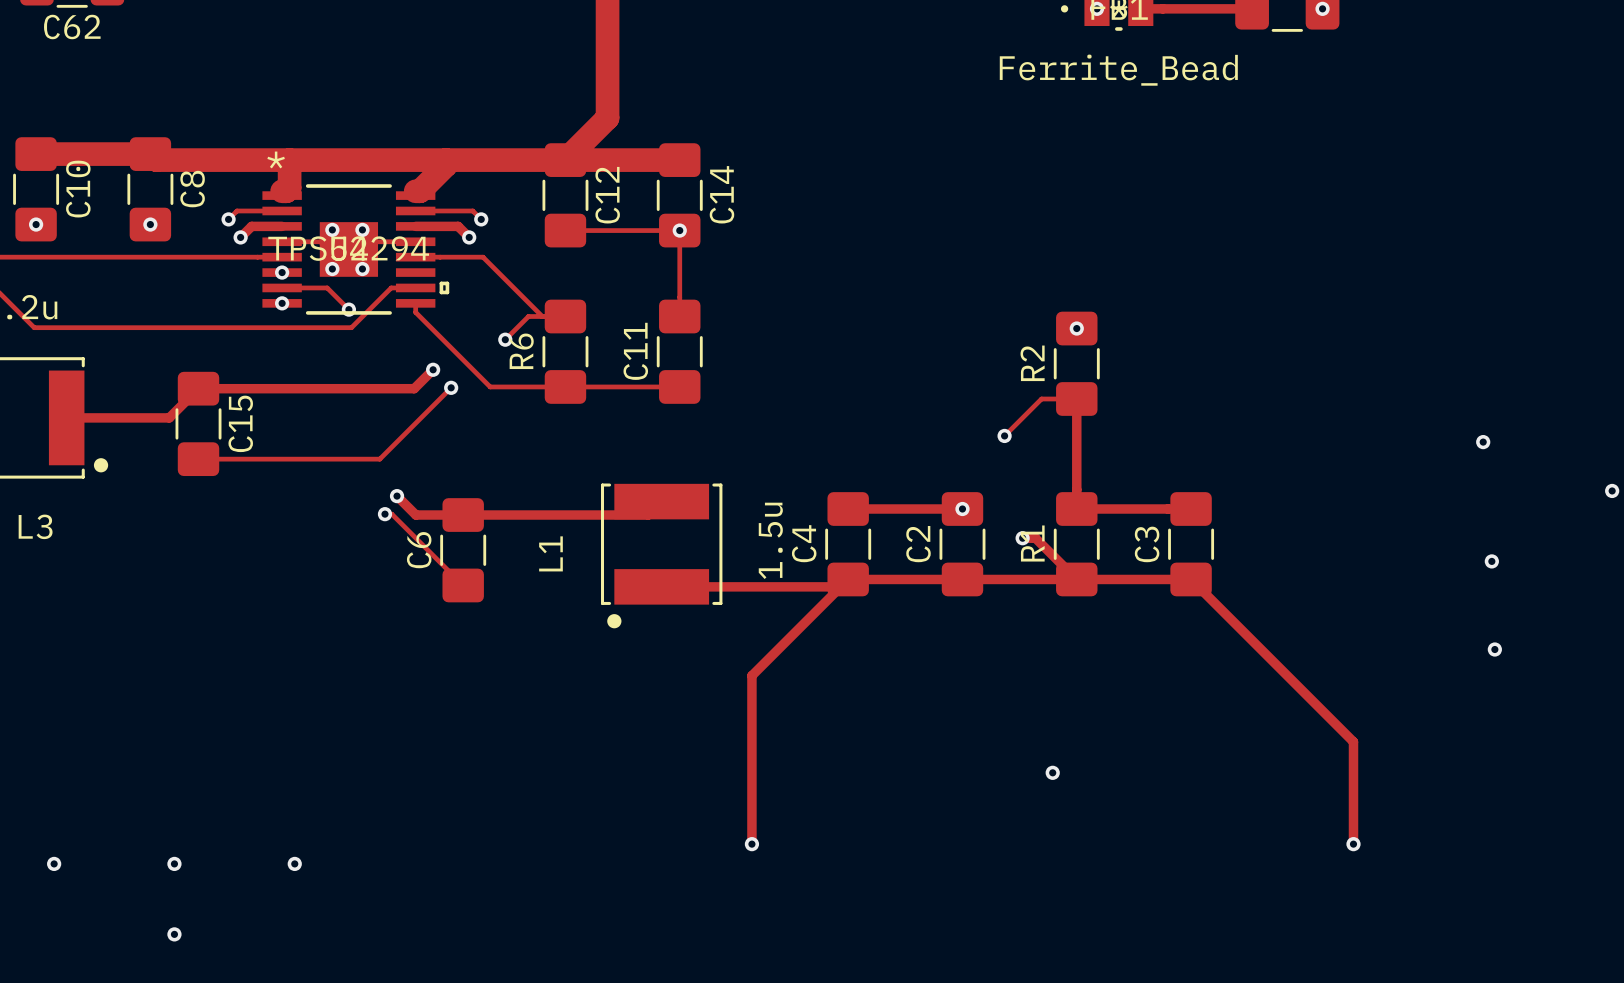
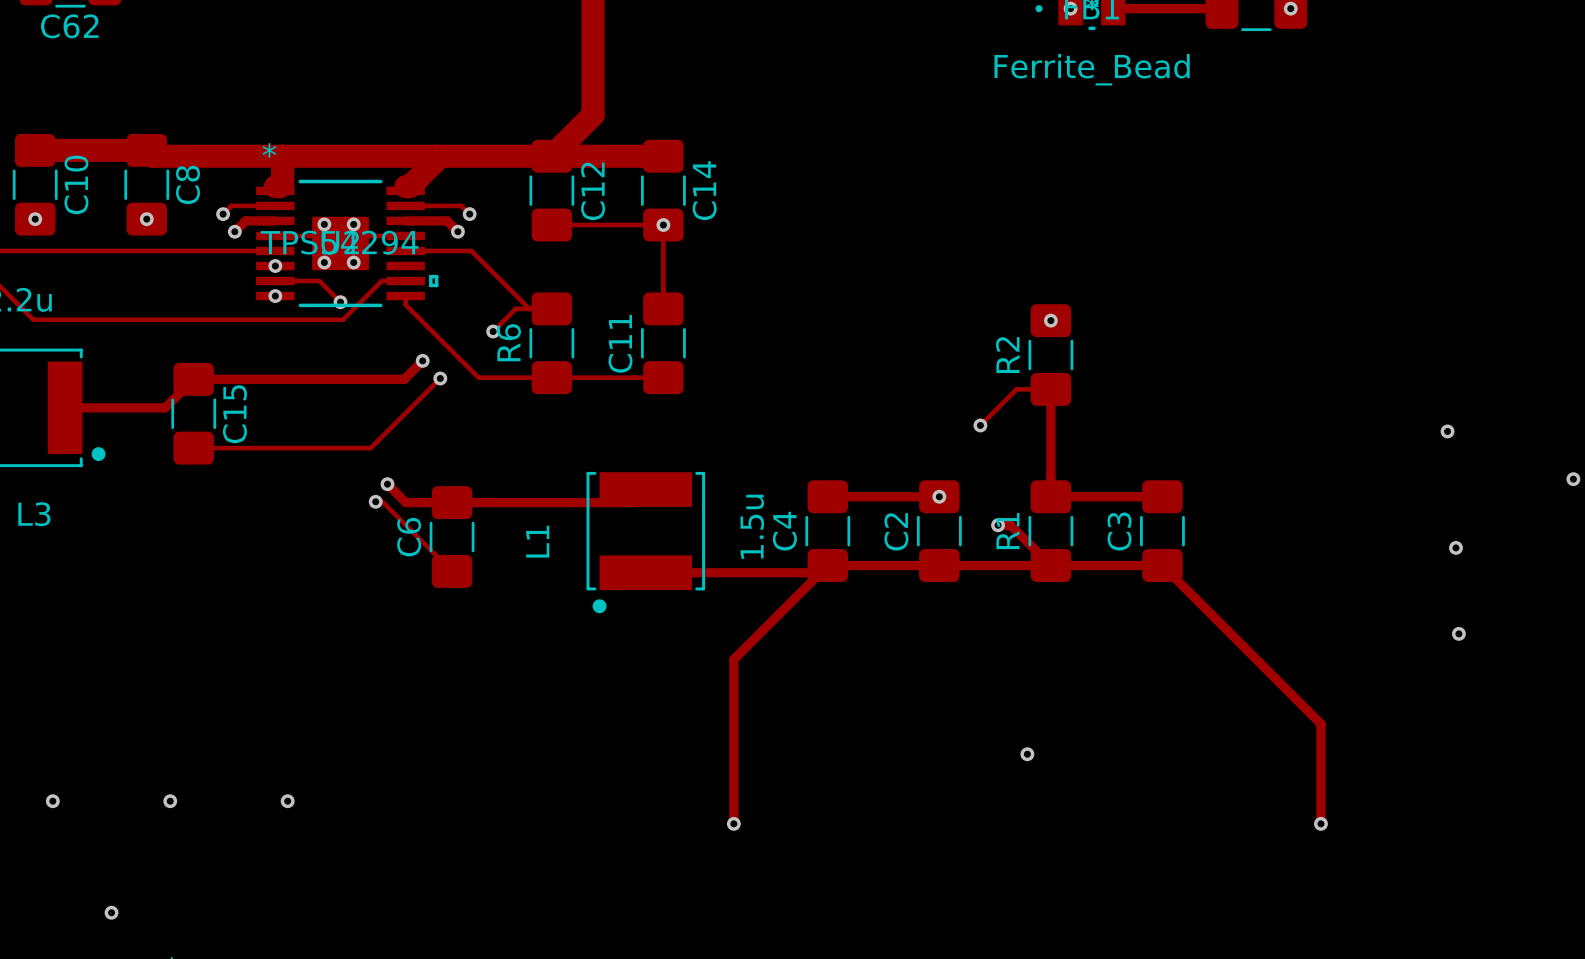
via position: (54, 863) -> (52, 801)
via position: (174, 863) -> (170, 801)
via position: (294, 863) -> (287, 801)
via: (174, 934) -> none
via: none -> (111, 912)

